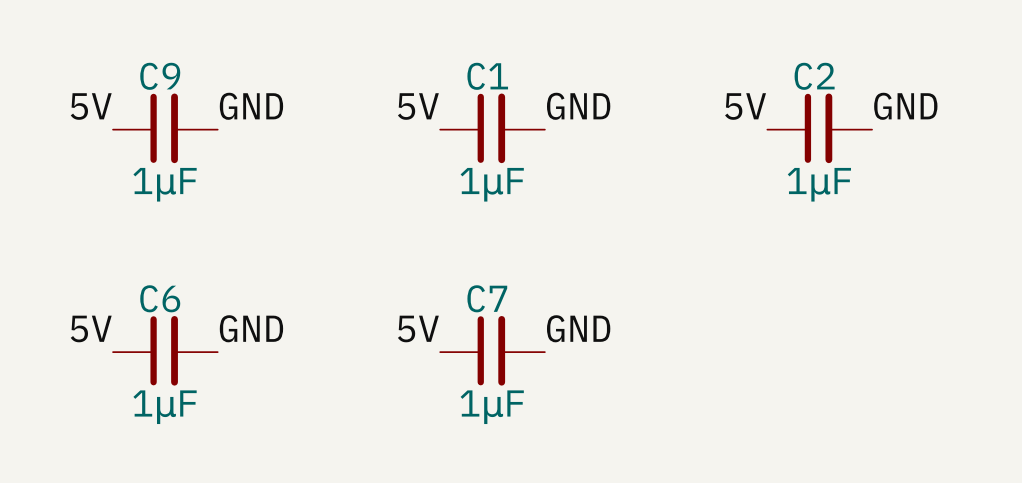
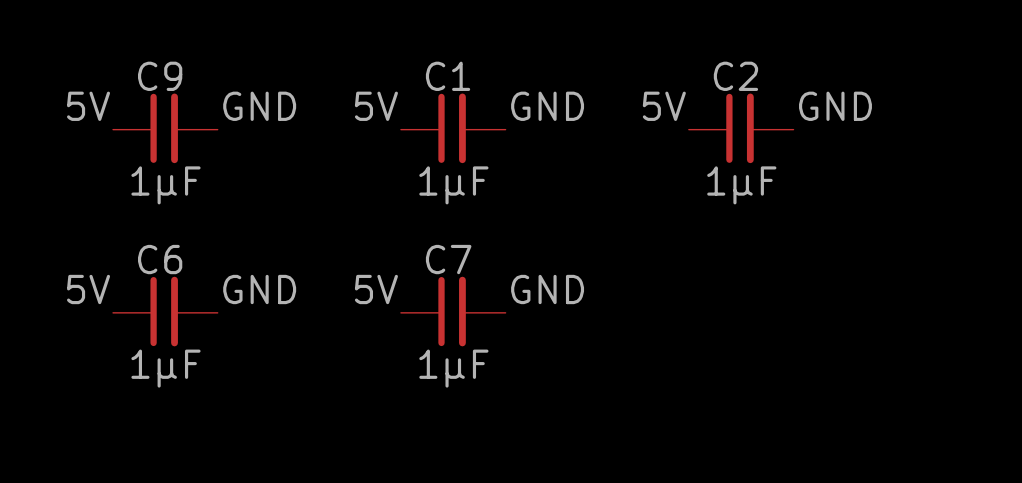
label position: 5V (418, 106) -> 5V (376, 106)
label position: GND (578, 106) -> GND (547, 106)
label position: 5V (745, 106) -> 5V (664, 106)
label position: GND (905, 106) -> GND (835, 106)
C1 position: (492, 128) -> (453, 128)
C2 position: (819, 128) -> (741, 128)
label position: 5V (91, 328) -> 5V (88, 289)
label position: GND (251, 328) -> GND (259, 289)
label position: 5V (418, 328) -> 5V (376, 289)
label position: GND (578, 328) -> GND (547, 289)
C6 position: (165, 350) -> (165, 311)
C7 position: (492, 350) -> (453, 311)

